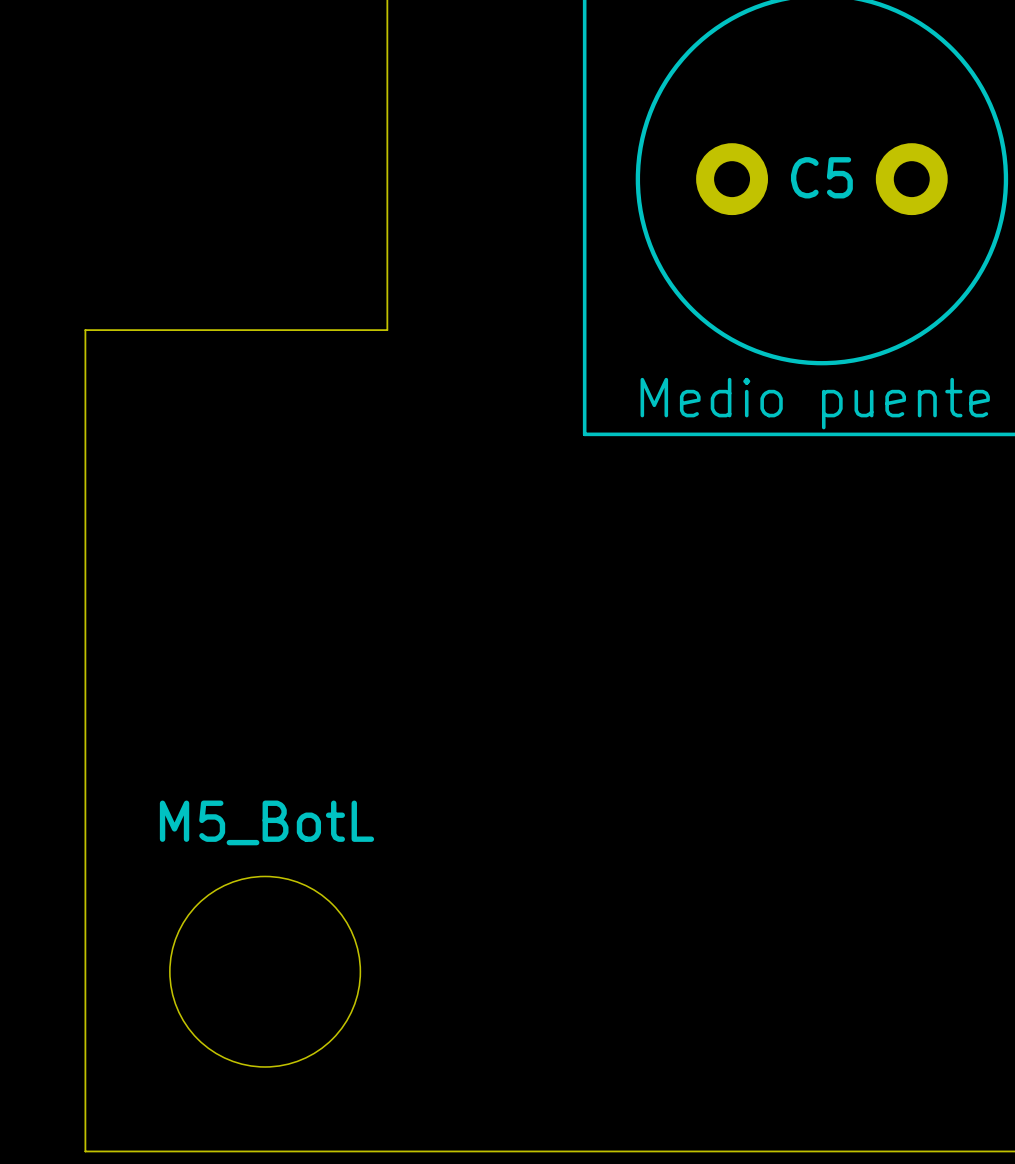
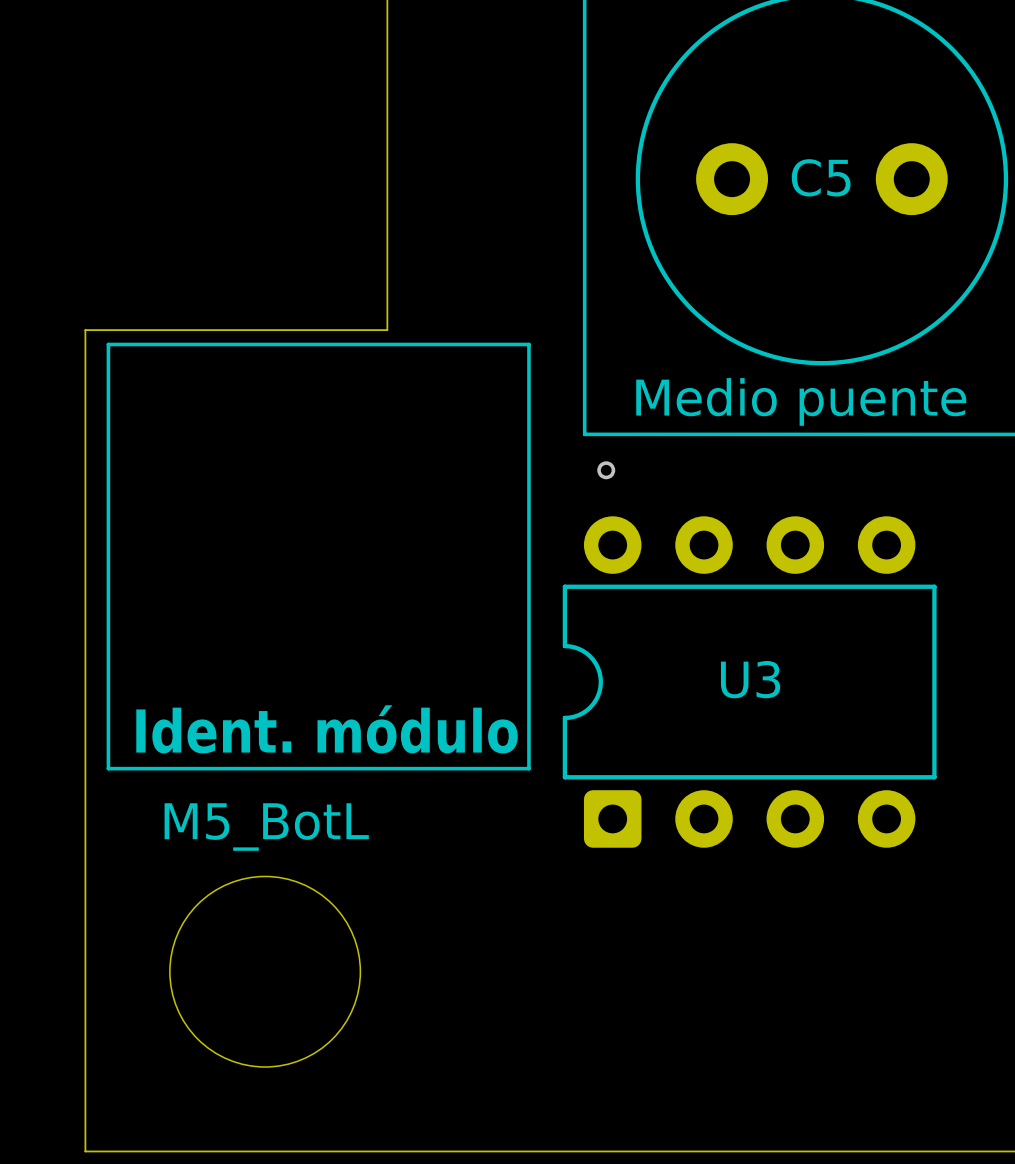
line: none -> (108, 344) (528, 344) (528, 768) (108, 768) (108, 344)
via: none -> (606, 470)
U3: none -> (749, 682)
text: none -> Ident. módulo (327, 729)

